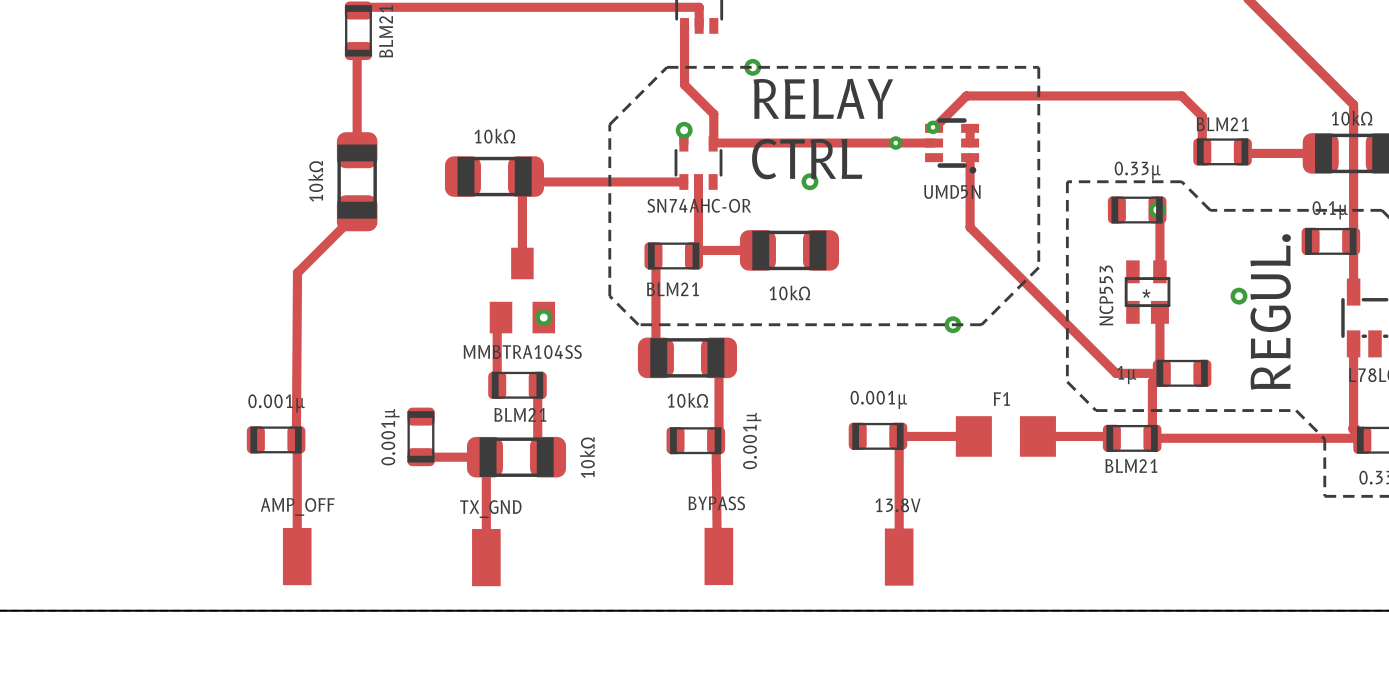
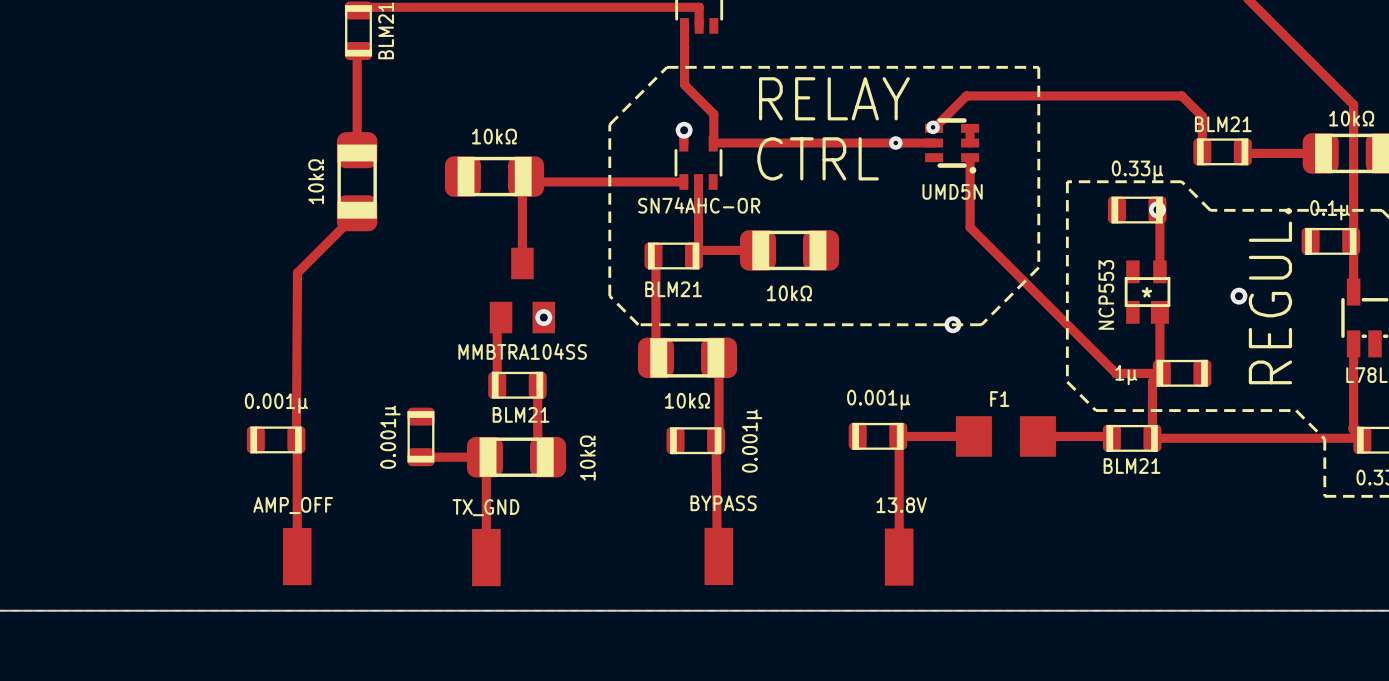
via: (752, 67) -> none
via: (809, 181) -> none

